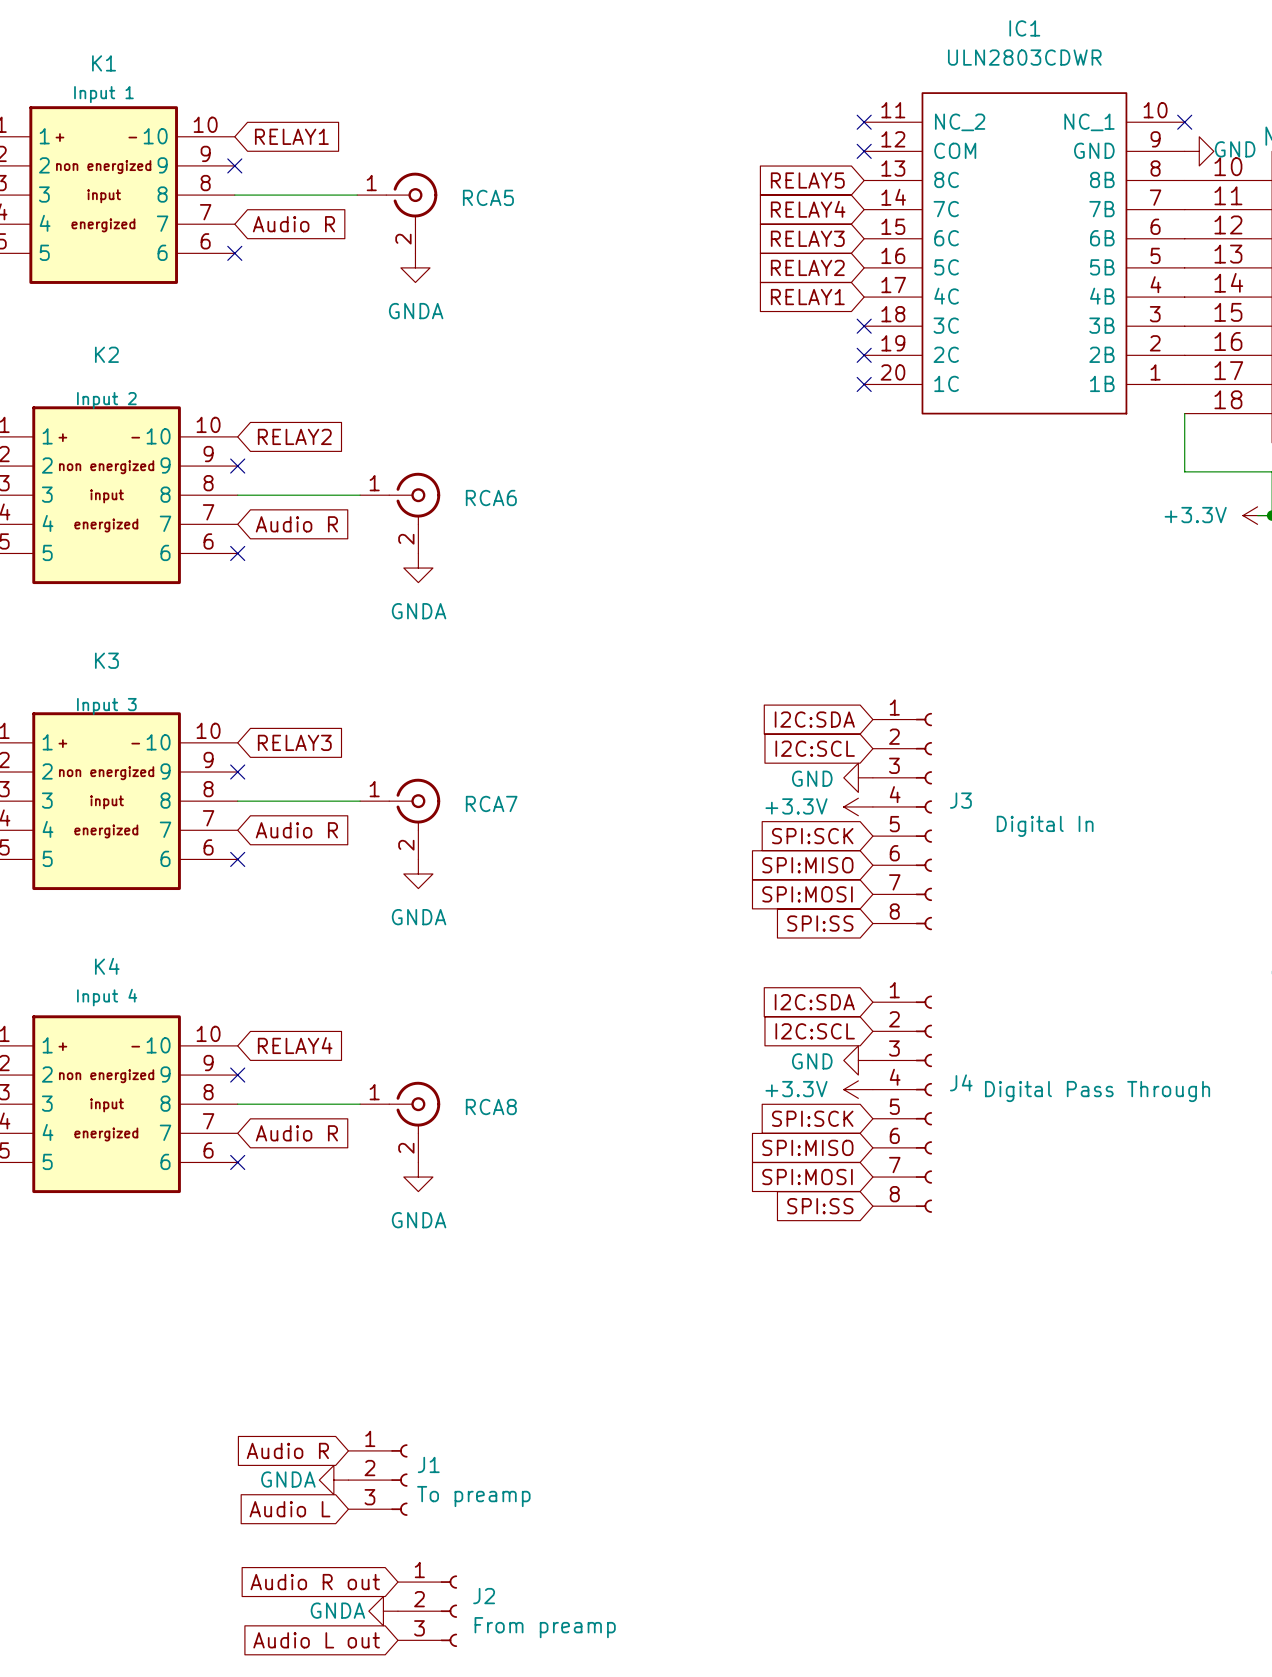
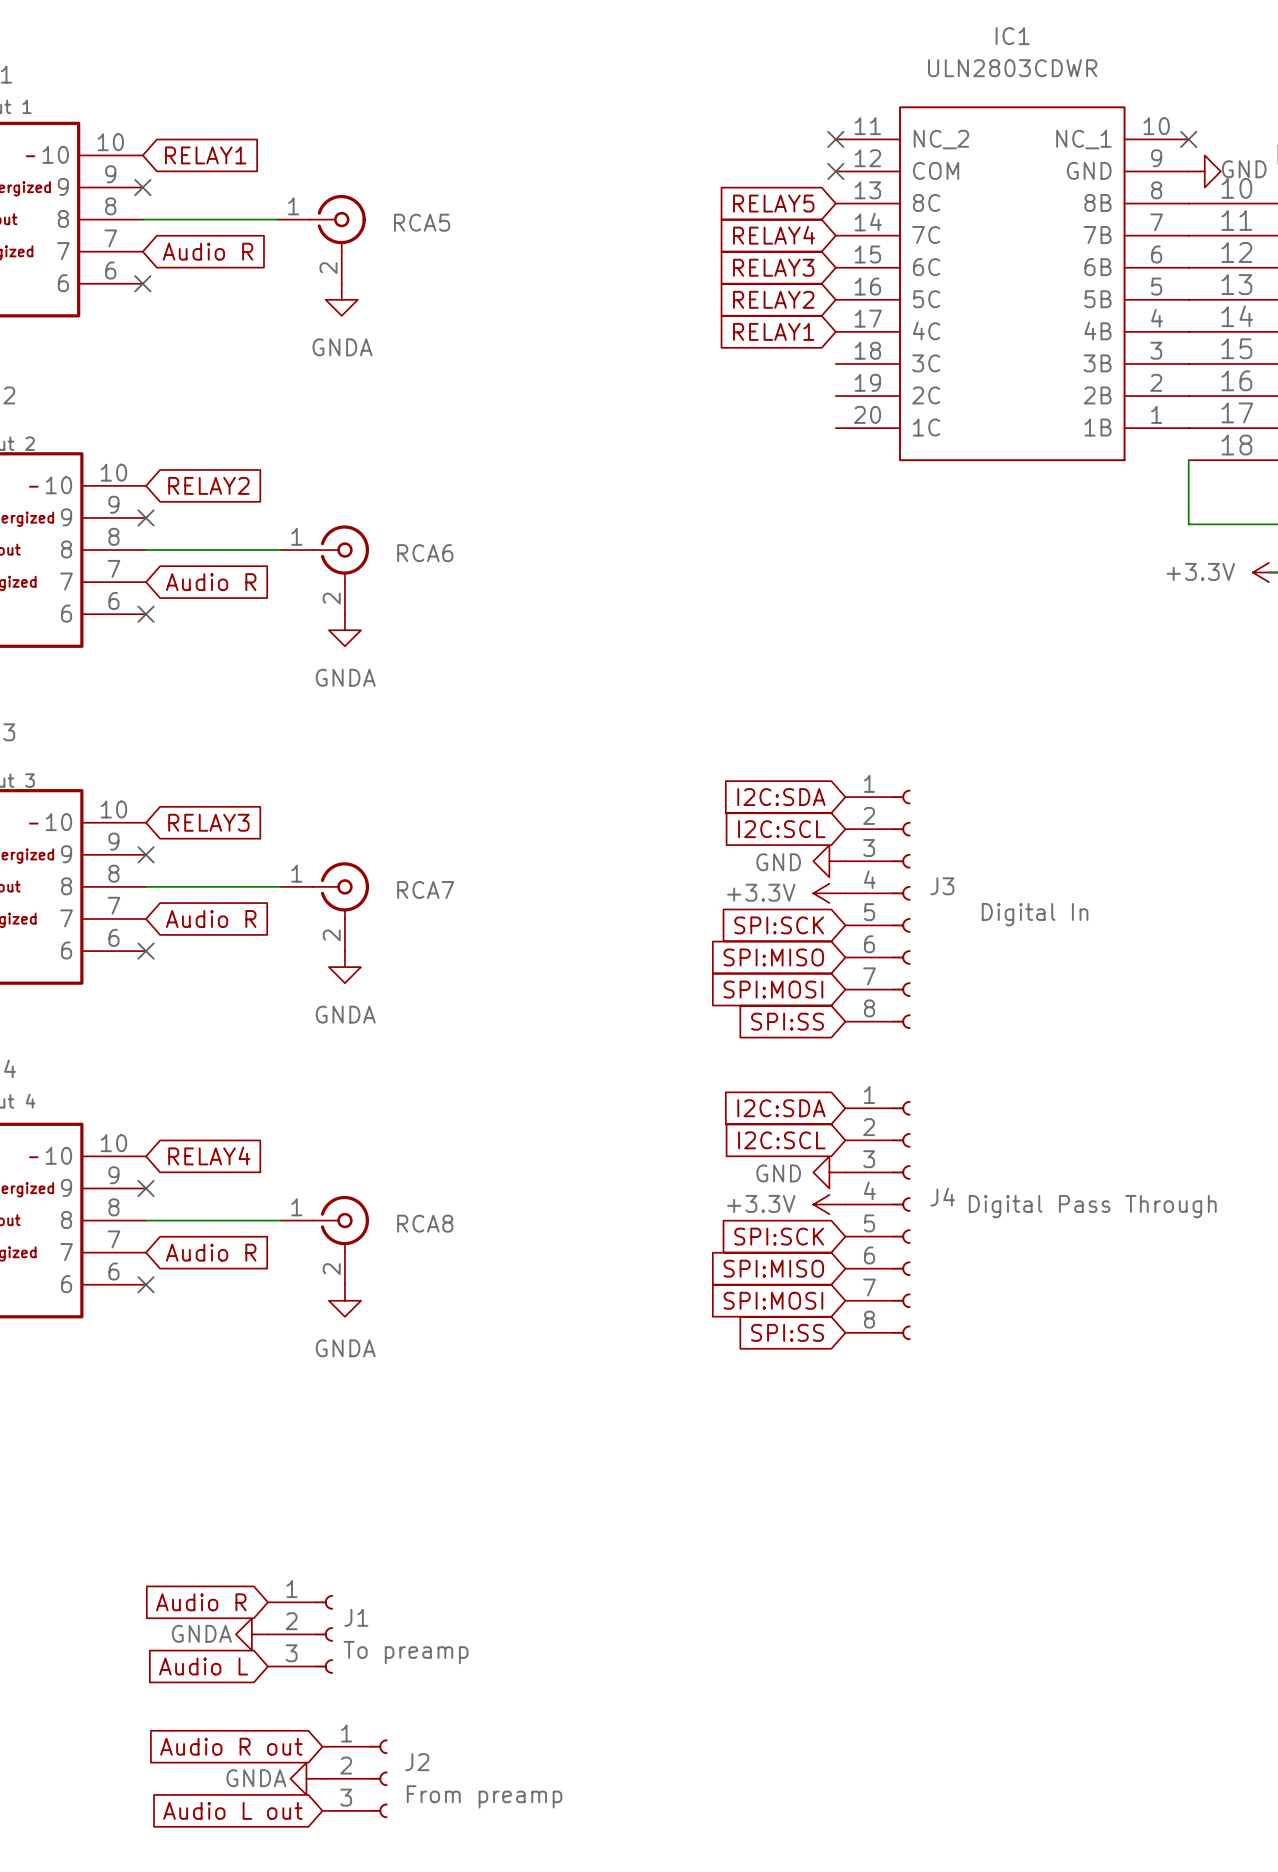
no-connect mark: (864, 326) -> none
no-connect mark: (864, 355) -> none
no-connect mark: (864, 384) -> none

